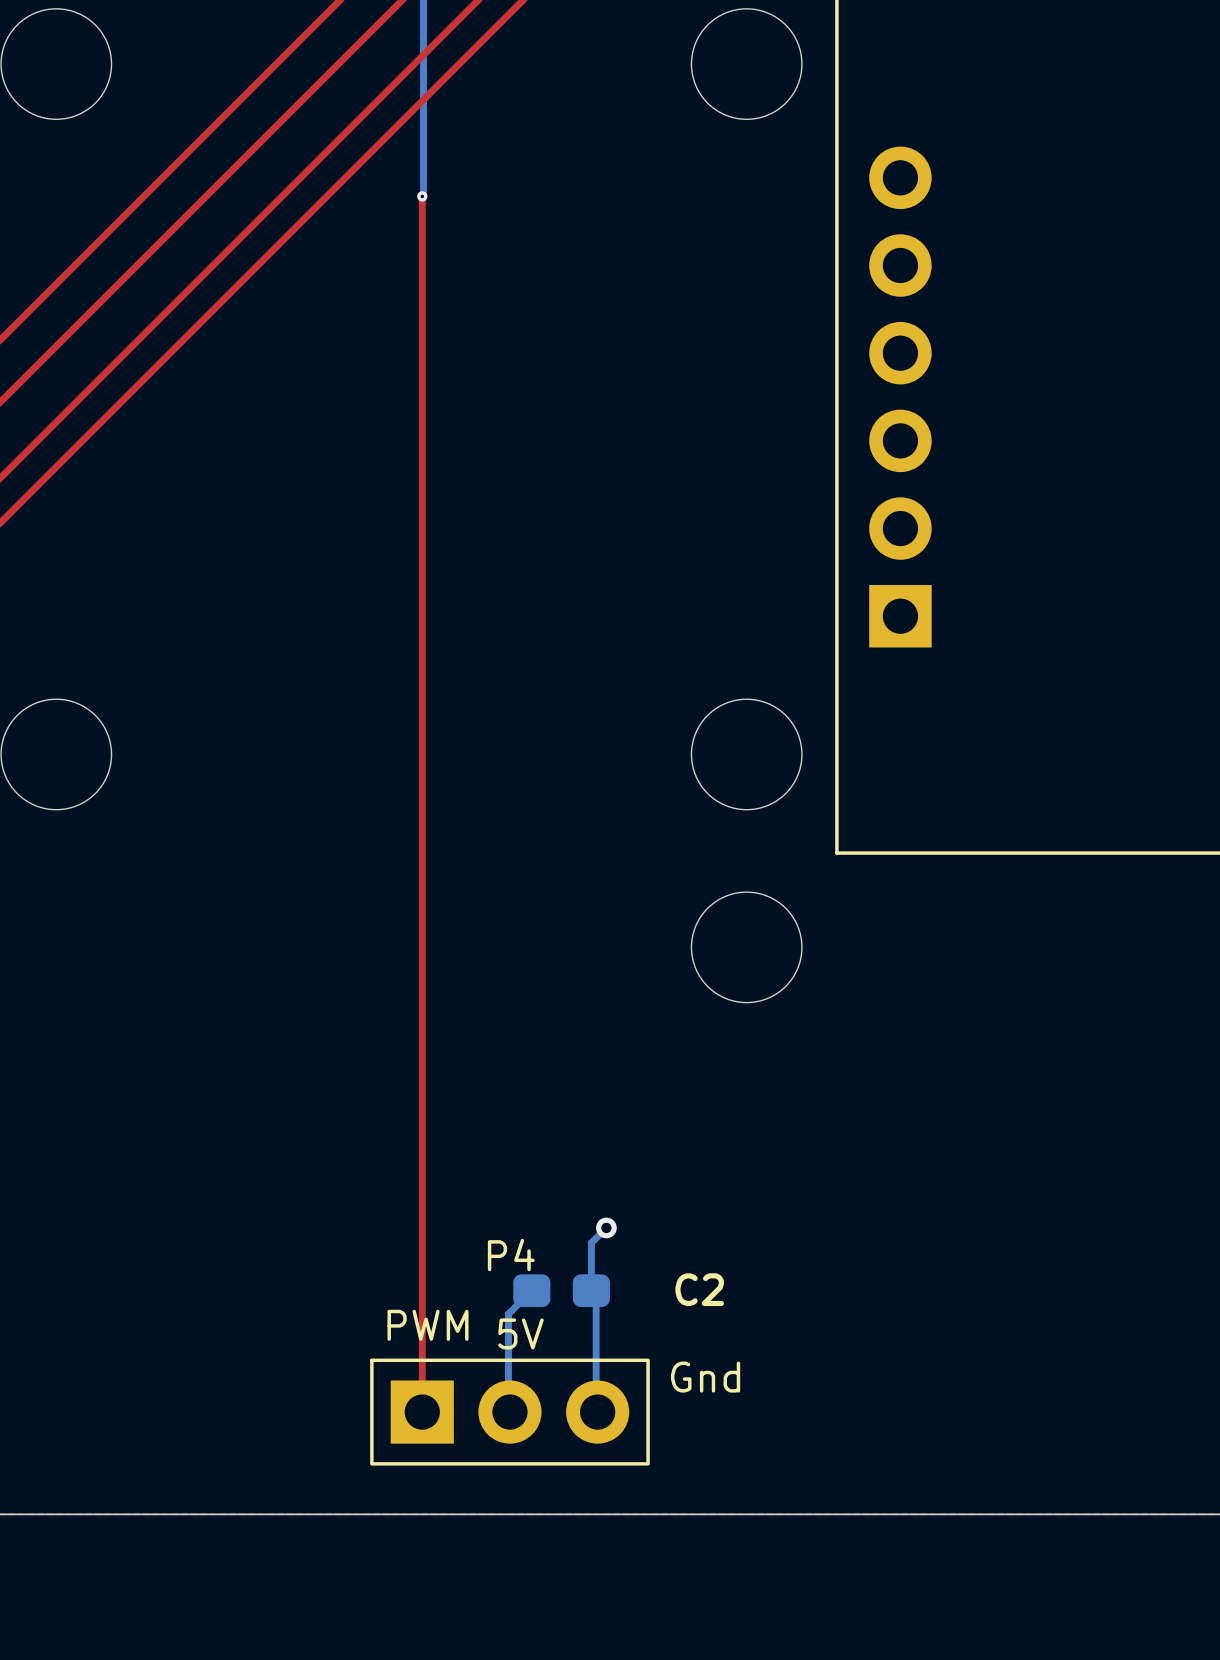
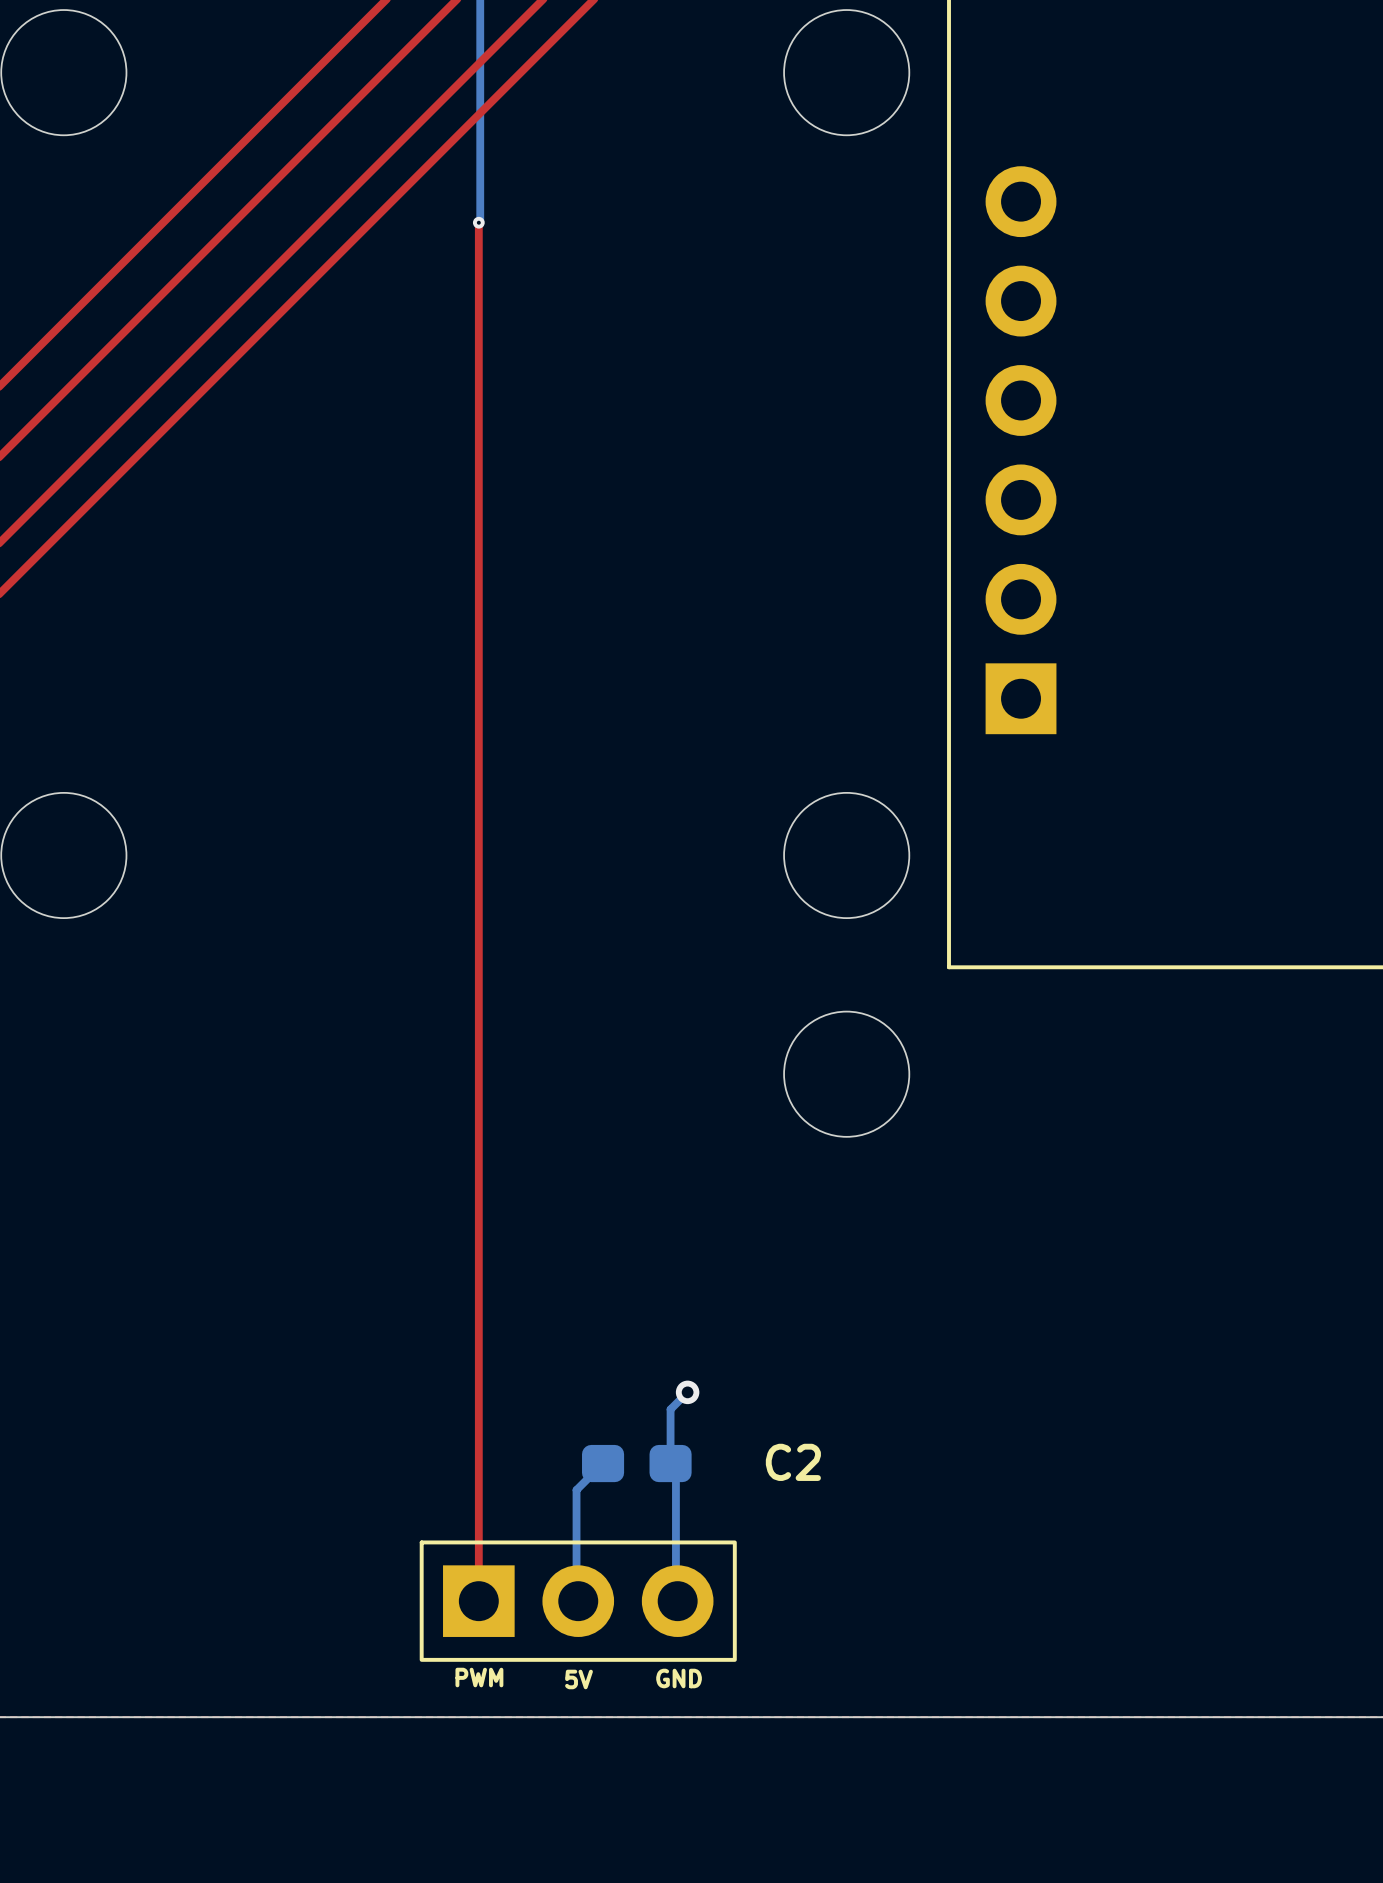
P4 name: P4 (511, 1255) -> none
text: PWM (428, 1325) -> none
text: 5V (521, 1333) -> none
text: Gnd (705, 1377) -> none
P4 text: none -> PWM (479, 1677)
P4 text: none -> GND (679, 1678)
P4 text: none -> 5V (578, 1679)

